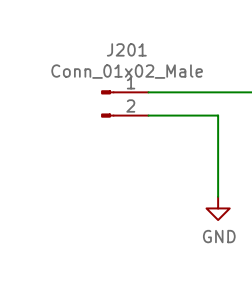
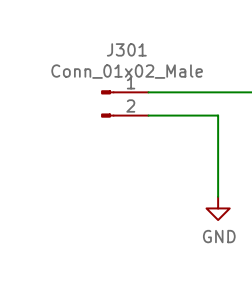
J201 name: J201 (126, 49) -> J301 (126, 49)

